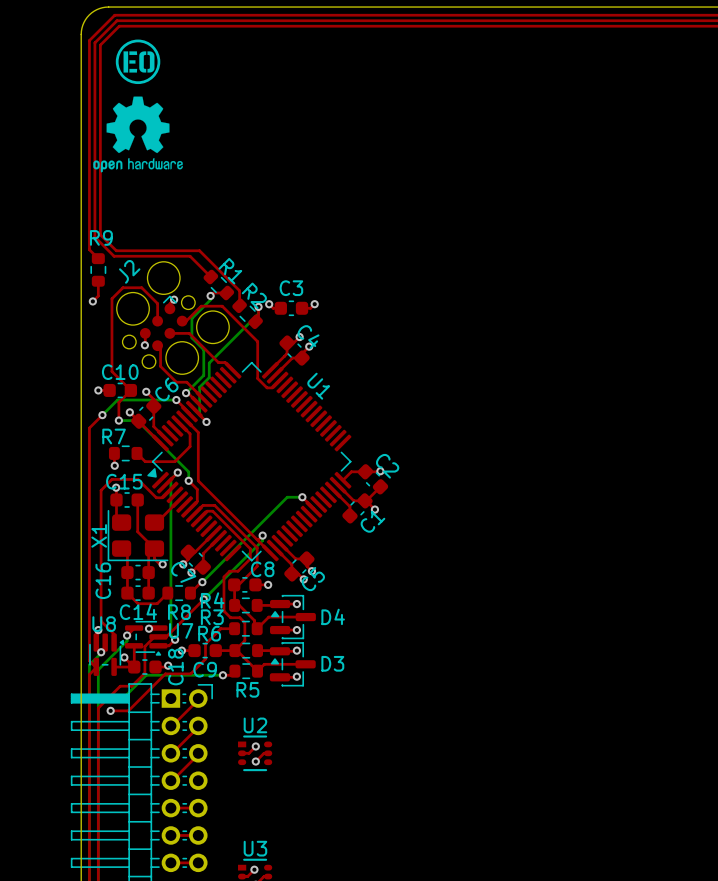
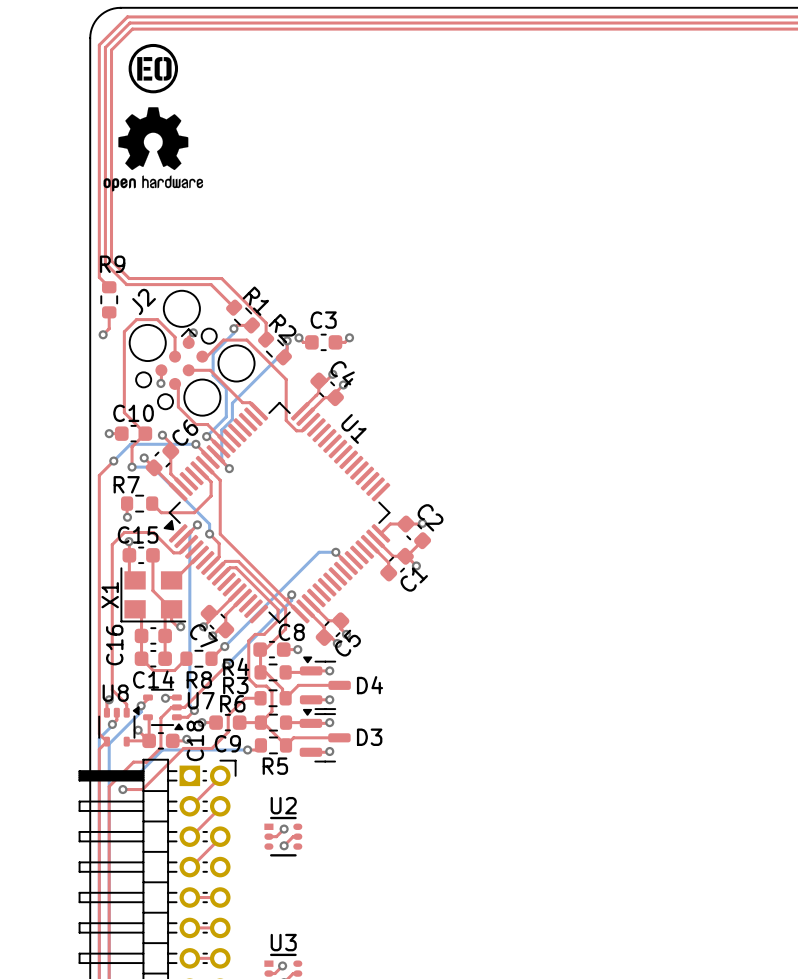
X1 footprint: [107, 509, 169, 562] -> [120, 567, 187, 623]
D4 footprint: [270, 594, 316, 640] -> [299, 656, 351, 710]
U7 footprint: [125, 620, 168, 656] -> [143, 688, 184, 731]
U8 footprint: [89, 633, 124, 676] -> [98, 706, 140, 747]
D3 footprint: [269, 642, 316, 687] -> [299, 708, 351, 763]

